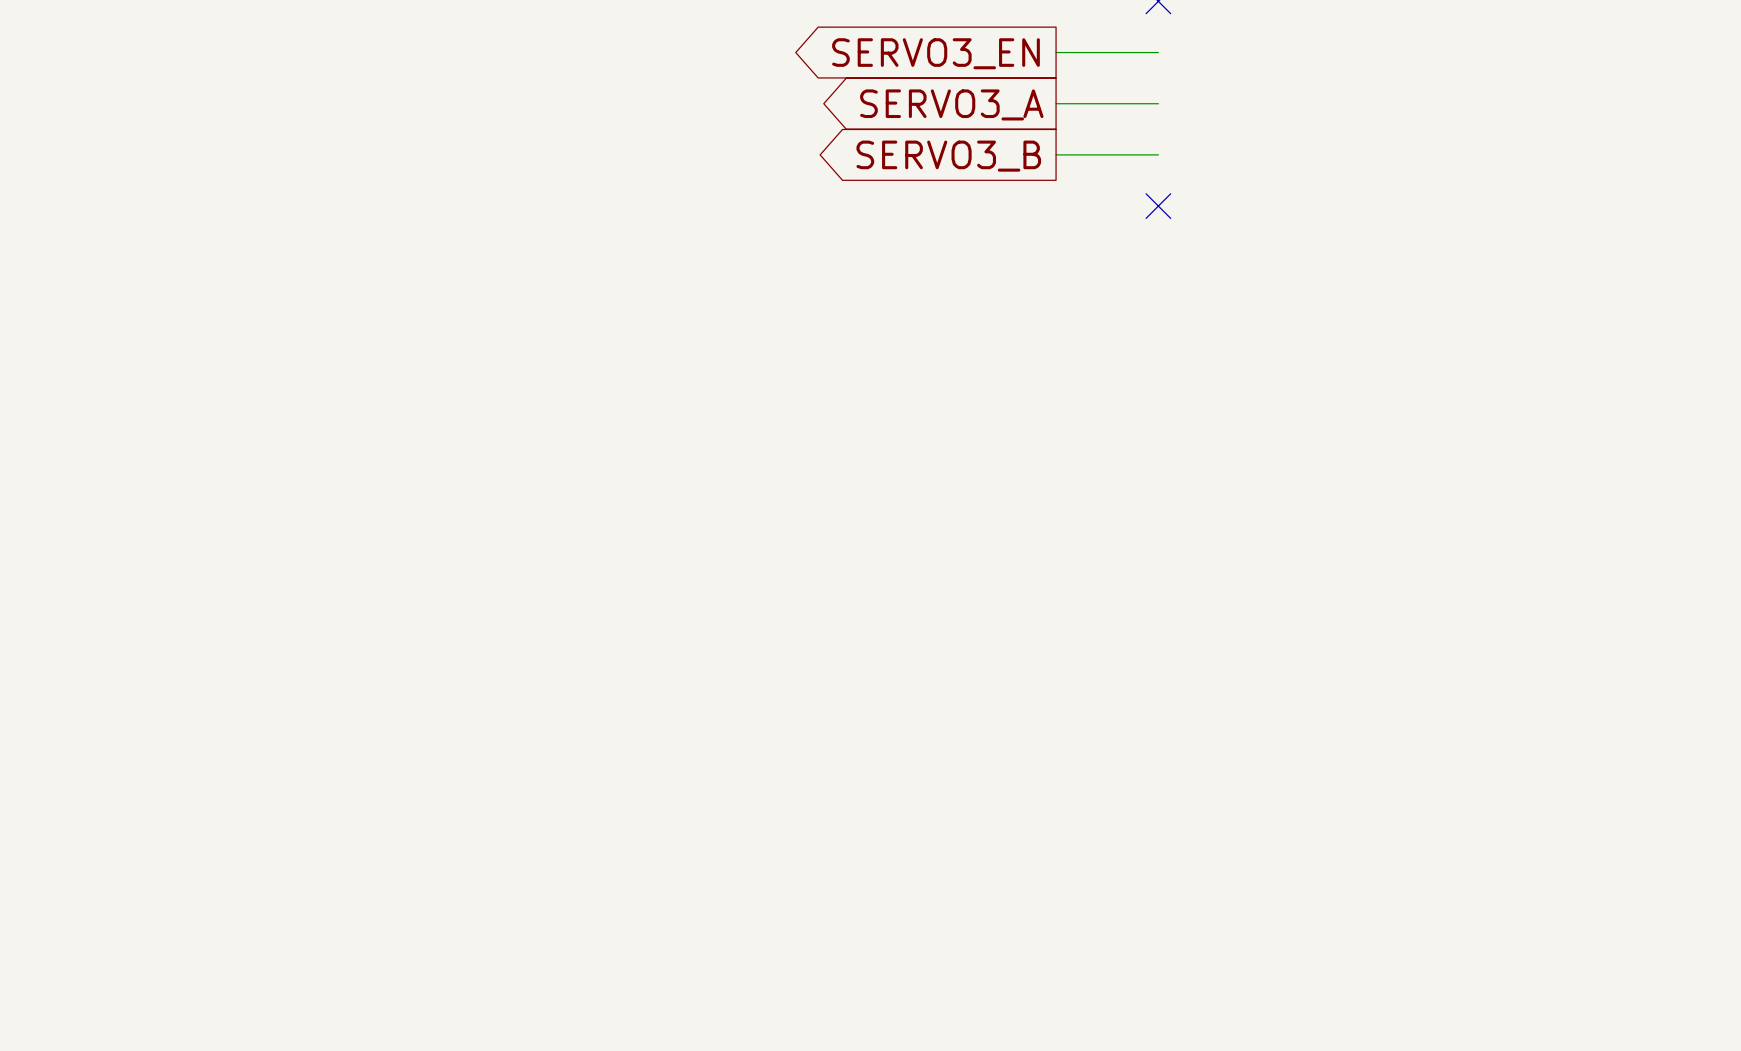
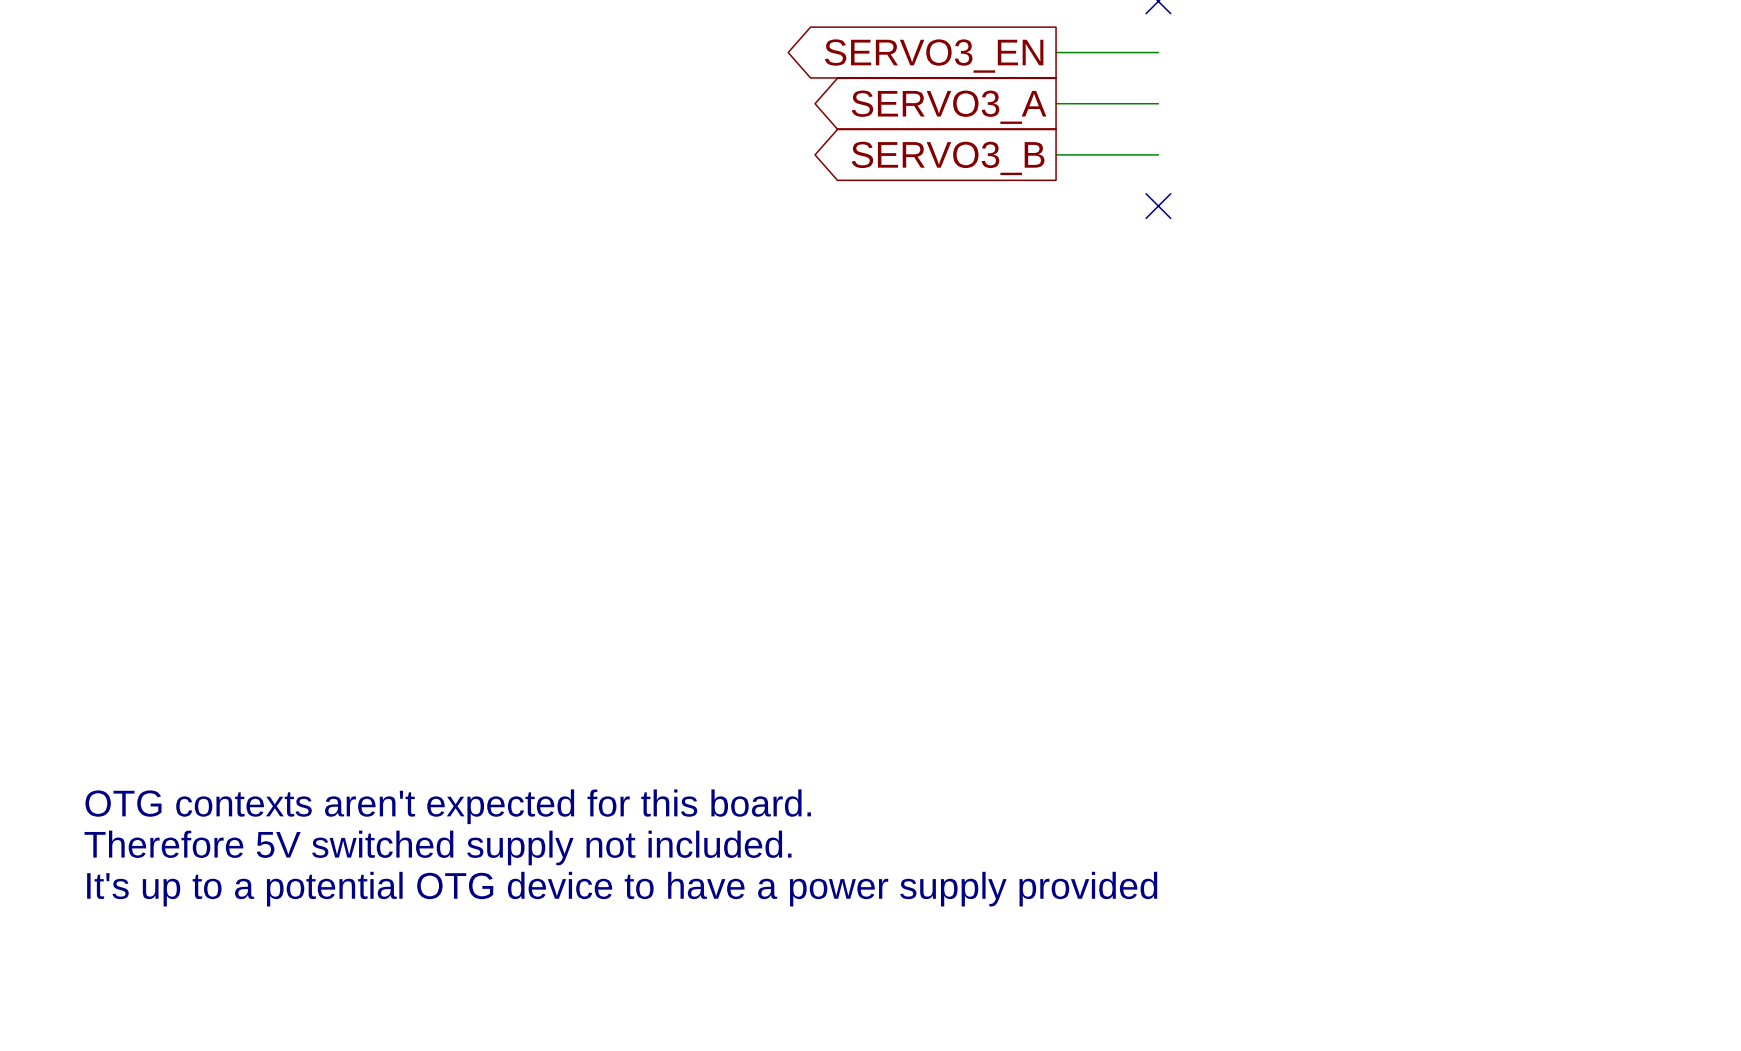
text: none -> OTG contexts aren't expected for this board. (448, 806)
text: none -> Therefore 5V switched supply not included. (438, 847)
text: none -> It's up to a potential OTG device to have a power supply provided (622, 889)

